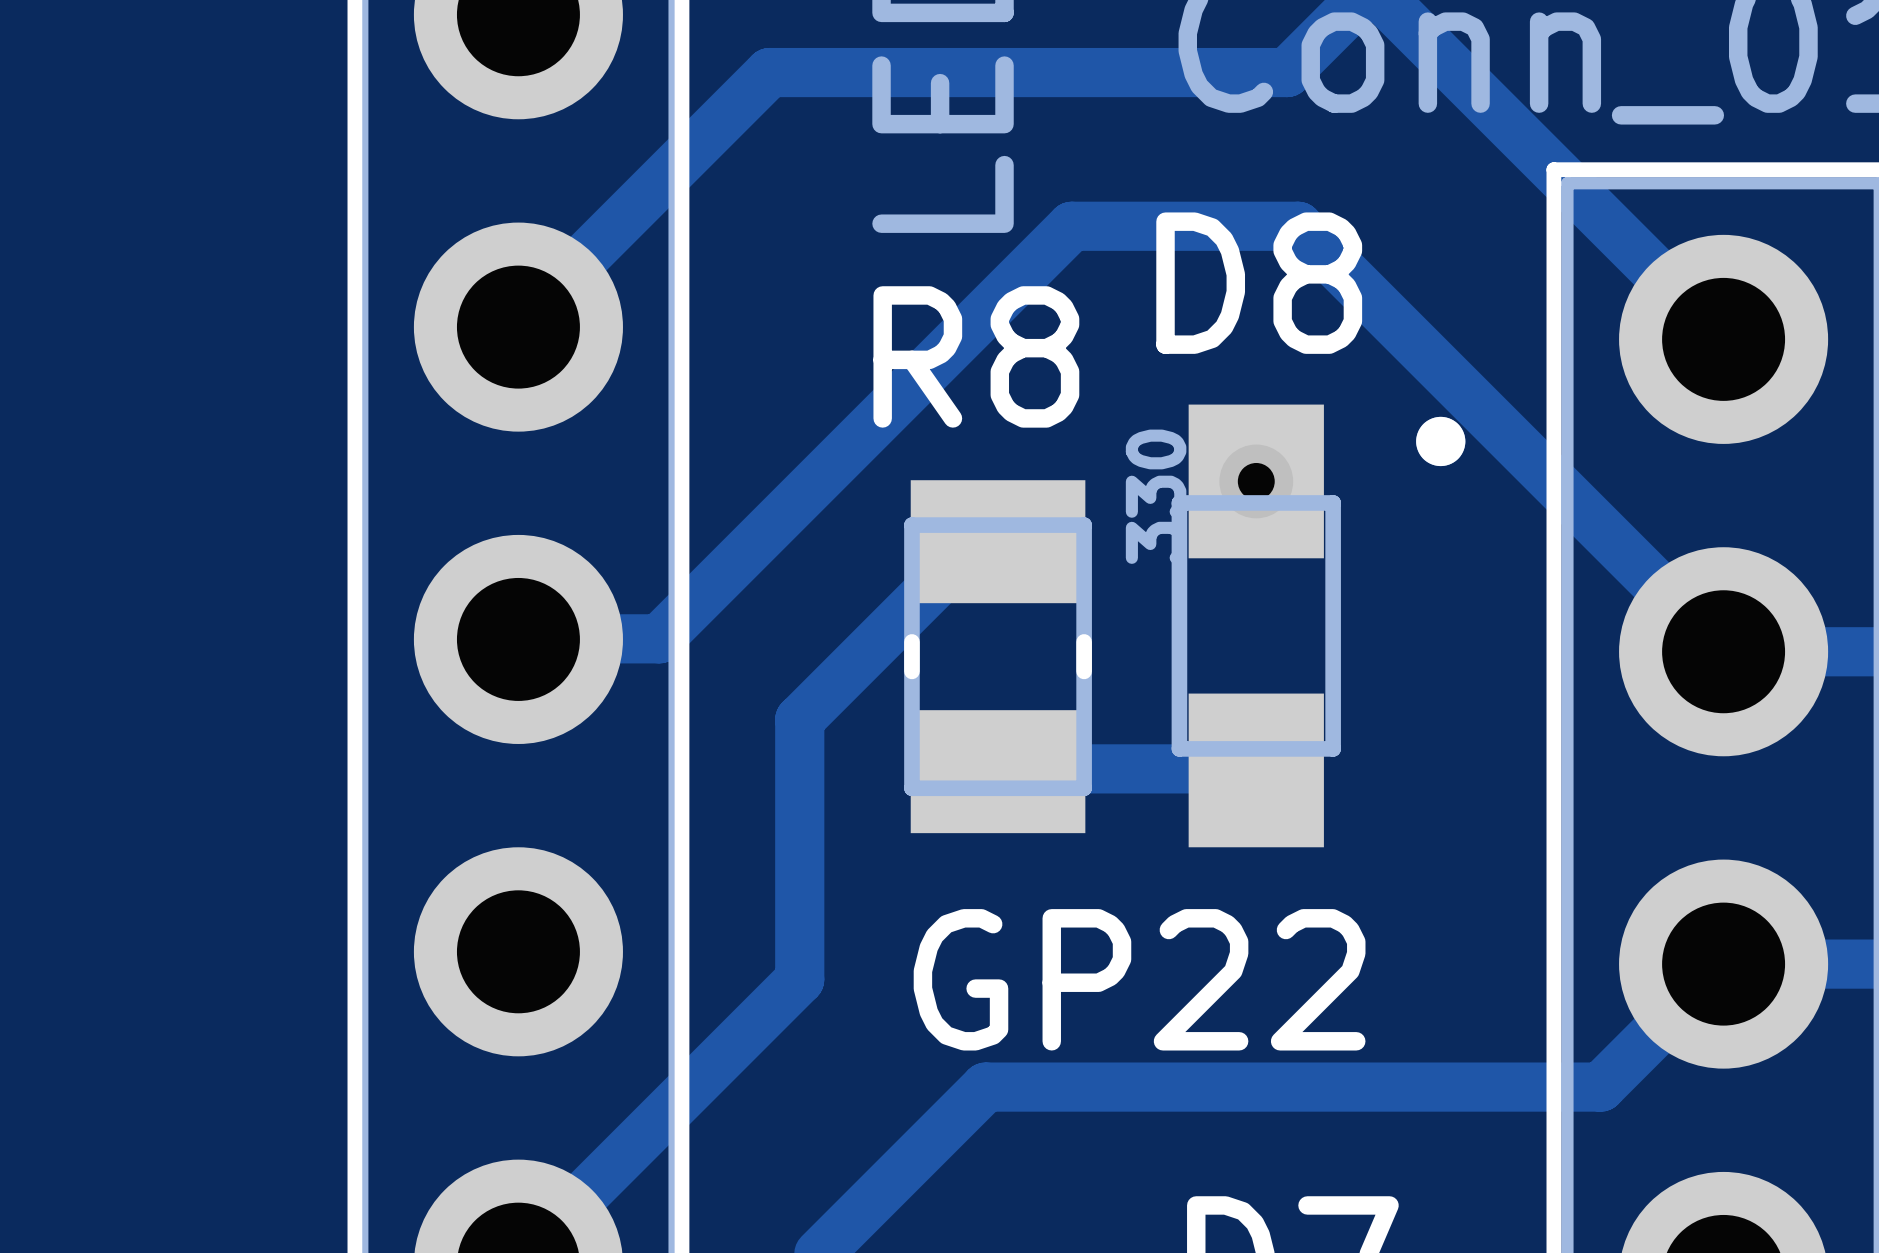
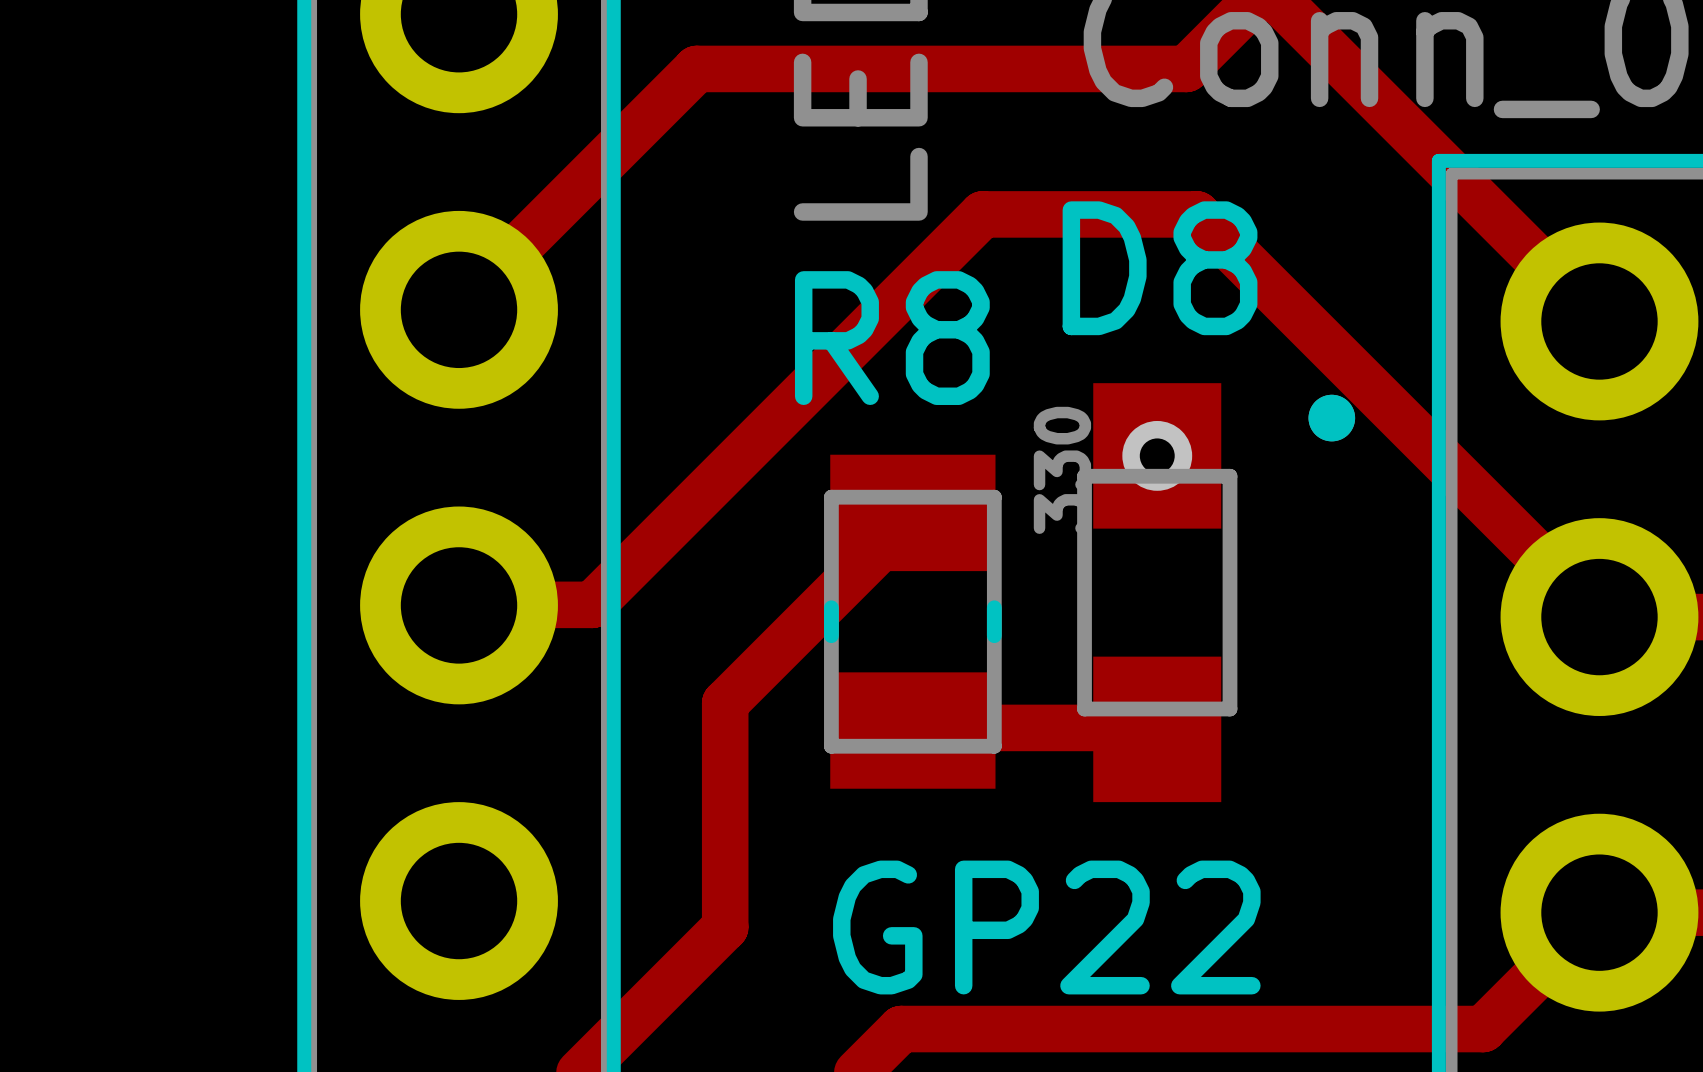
track: (998, 544) (974, 544) (799, 719) (799, 742) -> (912, 515) (725, 703)

